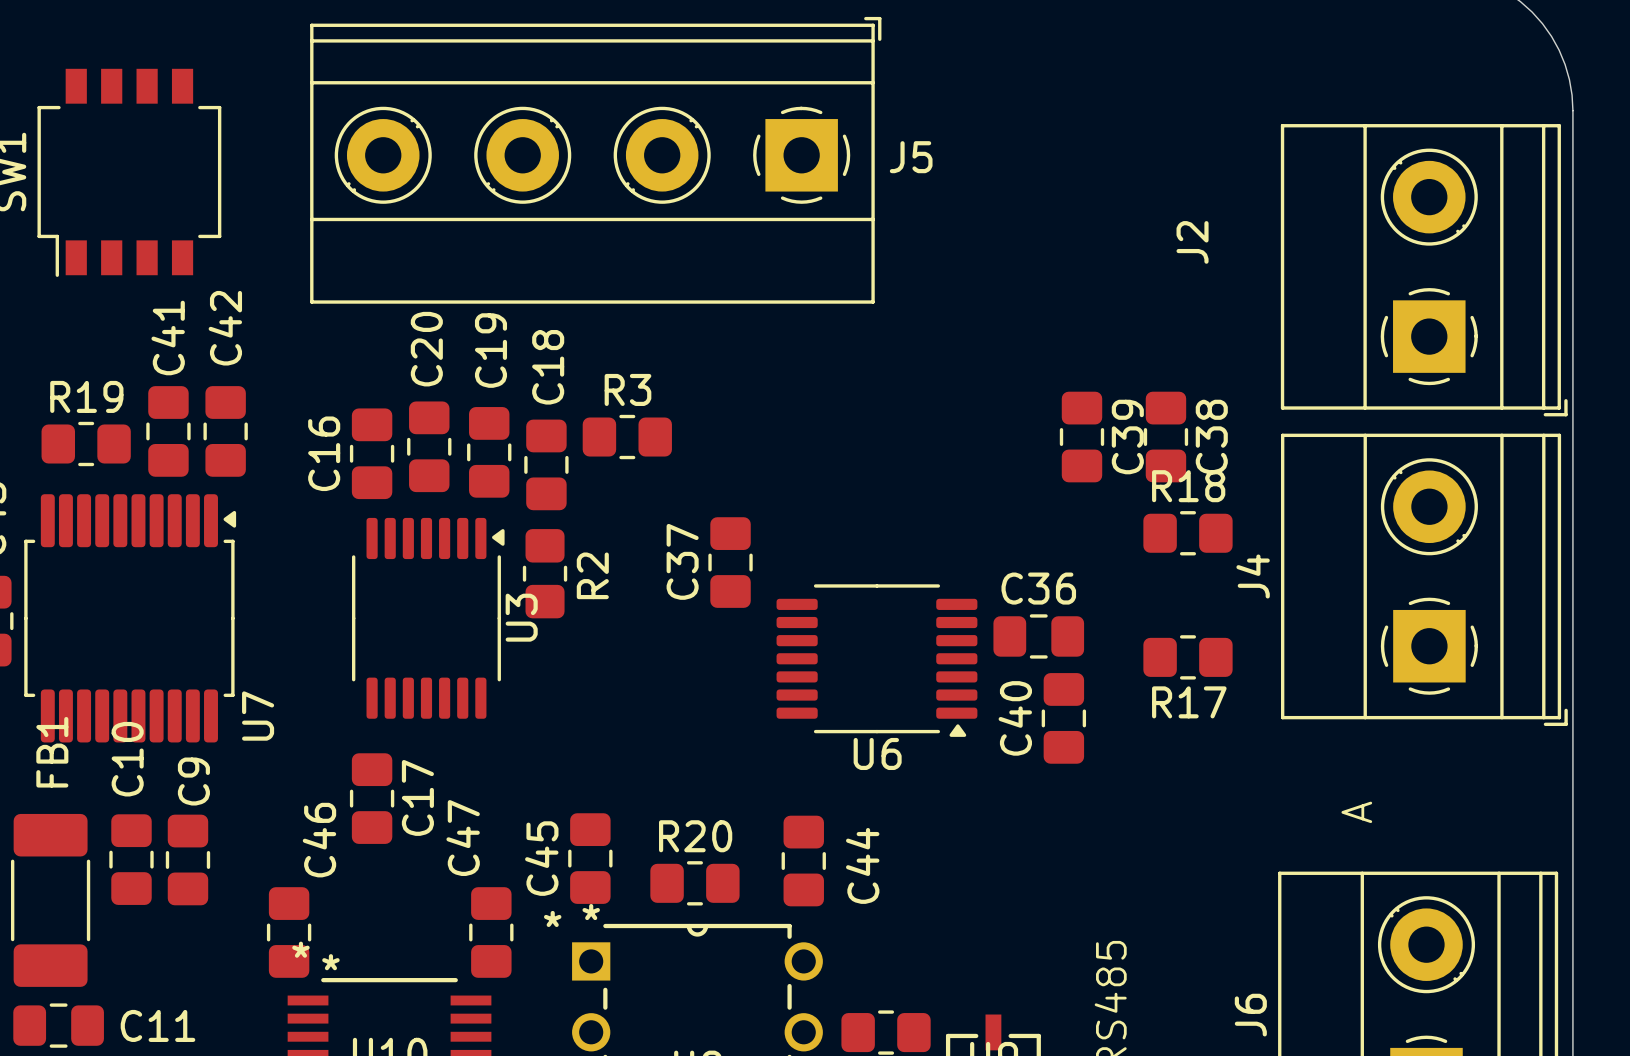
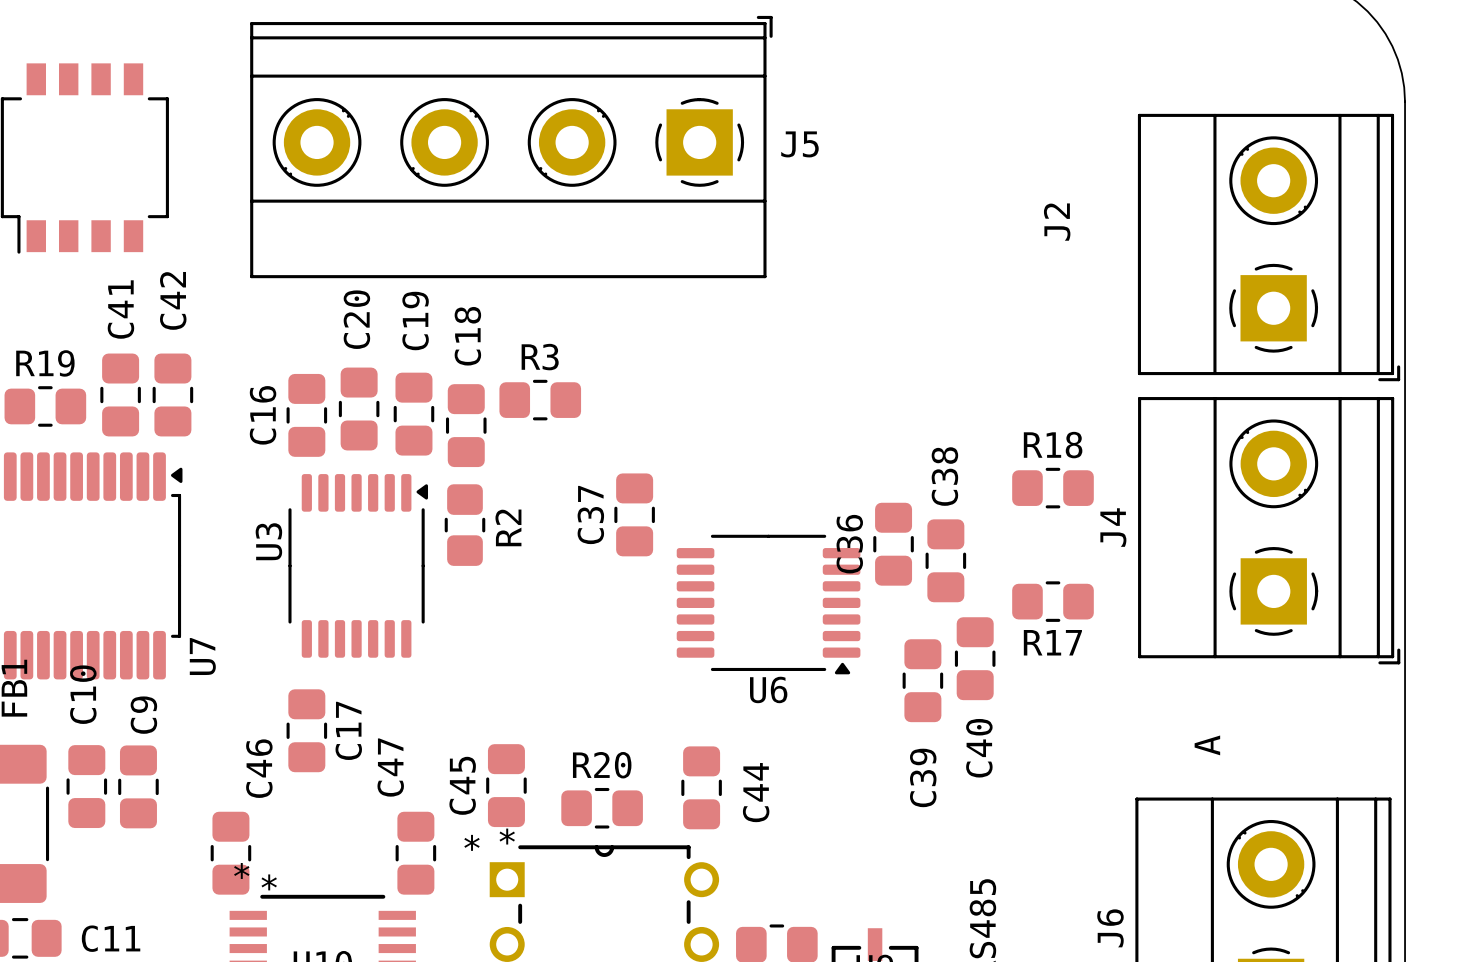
C39 position: (1081, 437) -> (922, 680)
C39 name position: C39 (1127, 437) -> C39 (923, 777)
C38 position: (1165, 437) -> (945, 560)
C38 name position: C38 (1211, 437) -> C38 (944, 476)
C36 name position: C36 (1038, 588) -> C36 (849, 544)
U3 name position: U3 (521, 617) -> U3 (268, 541)
C36 rotation: 0° (1038, 636) -> 90° clockwise (893, 544)
C40 name position: C40 (1015, 718) -> C40 (979, 748)
C40 position: (1063, 718) -> (975, 658)

